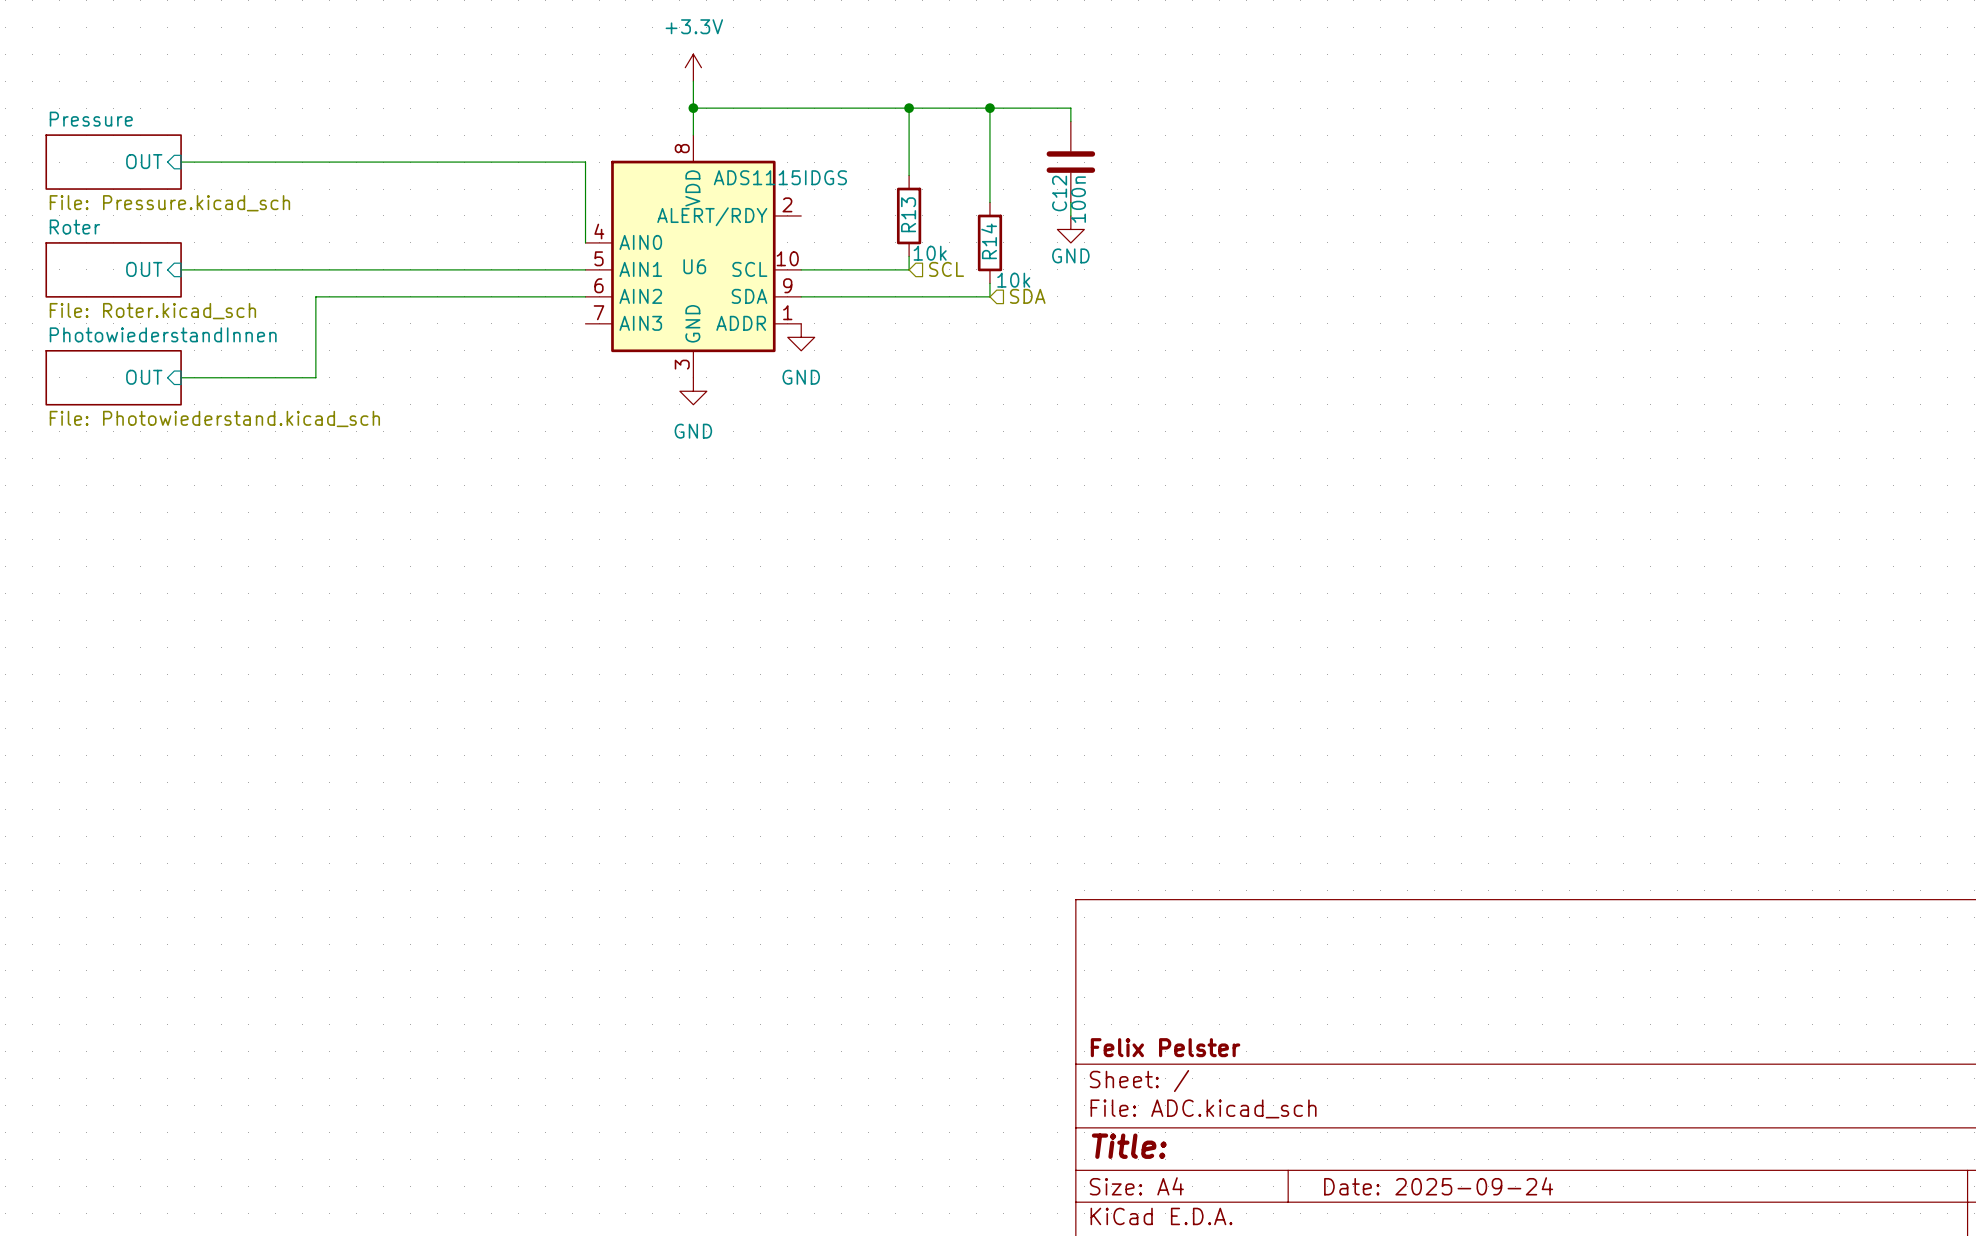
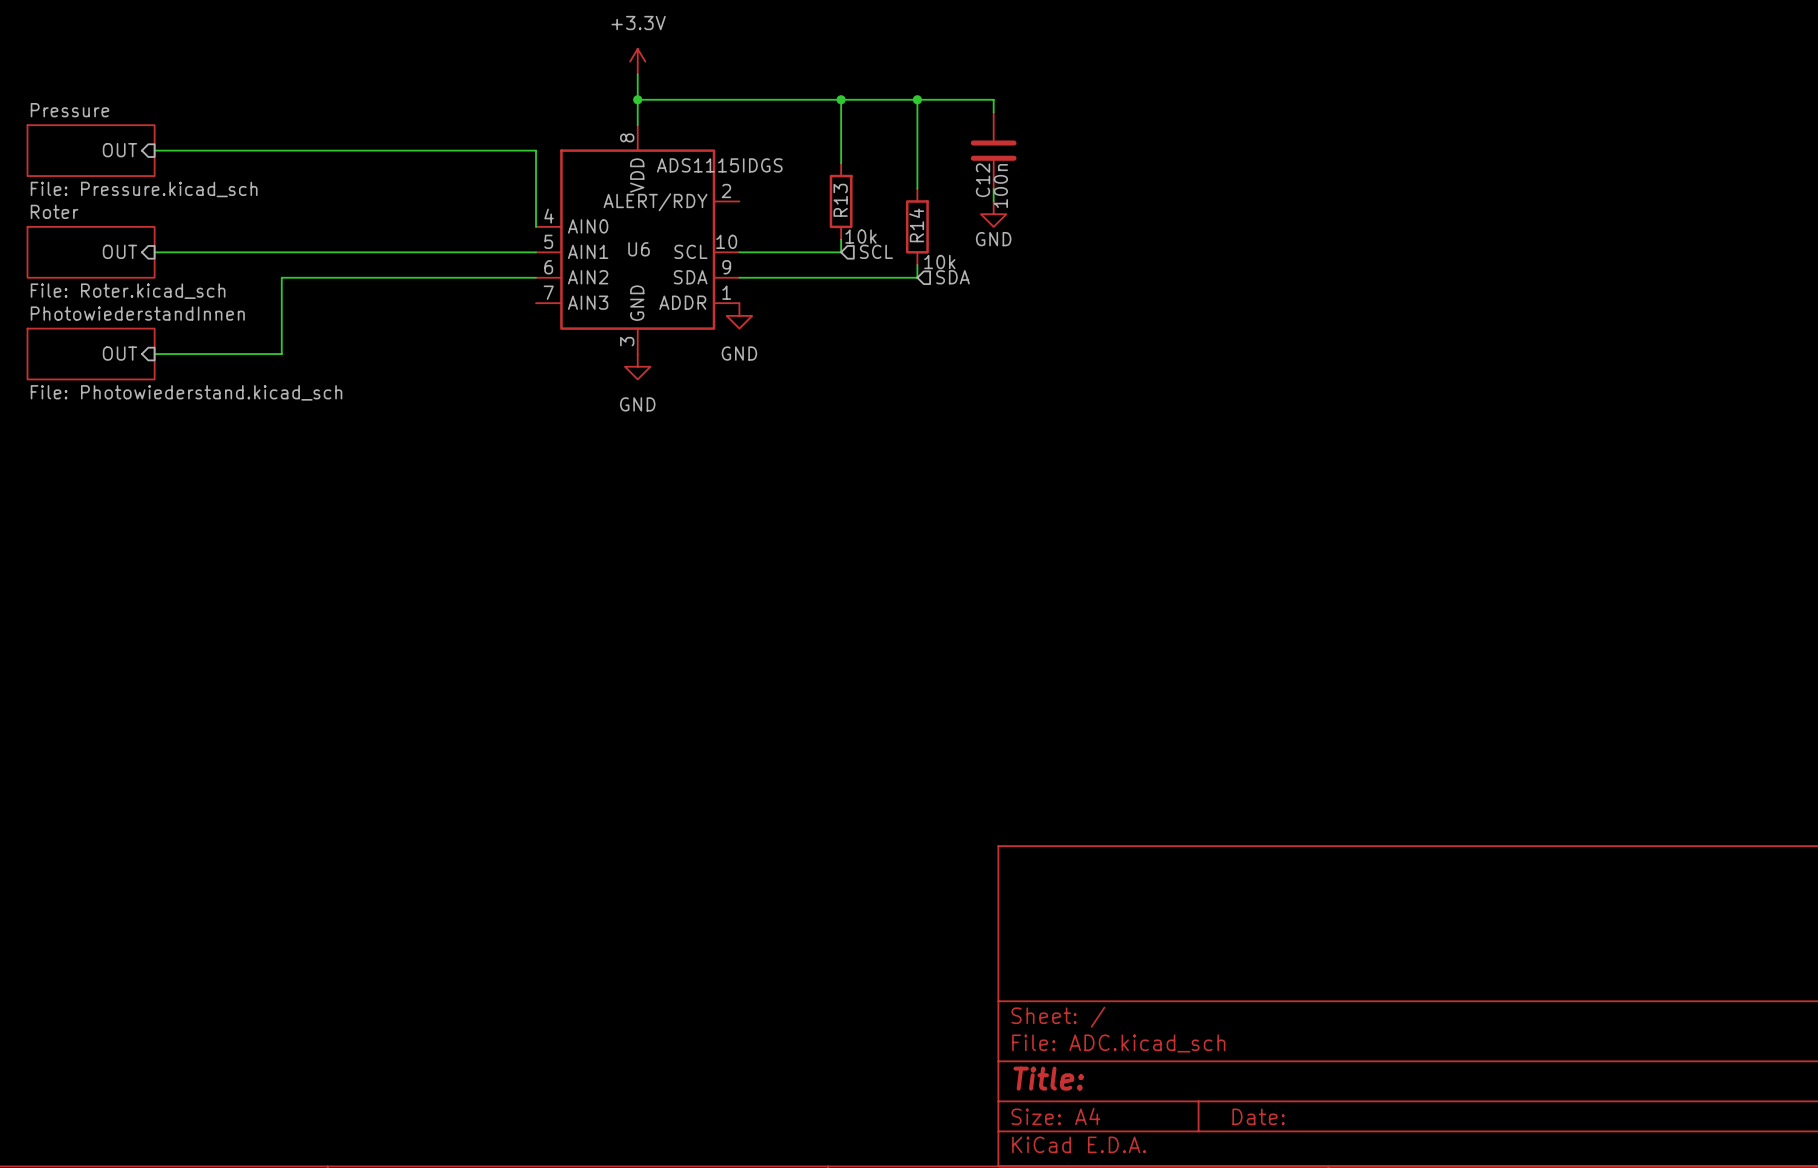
title block: Felix Pelster (1165, 1047) -> none
title block: Date: 2025-09-24 (1438, 1186) -> Date: (1258, 1116)

